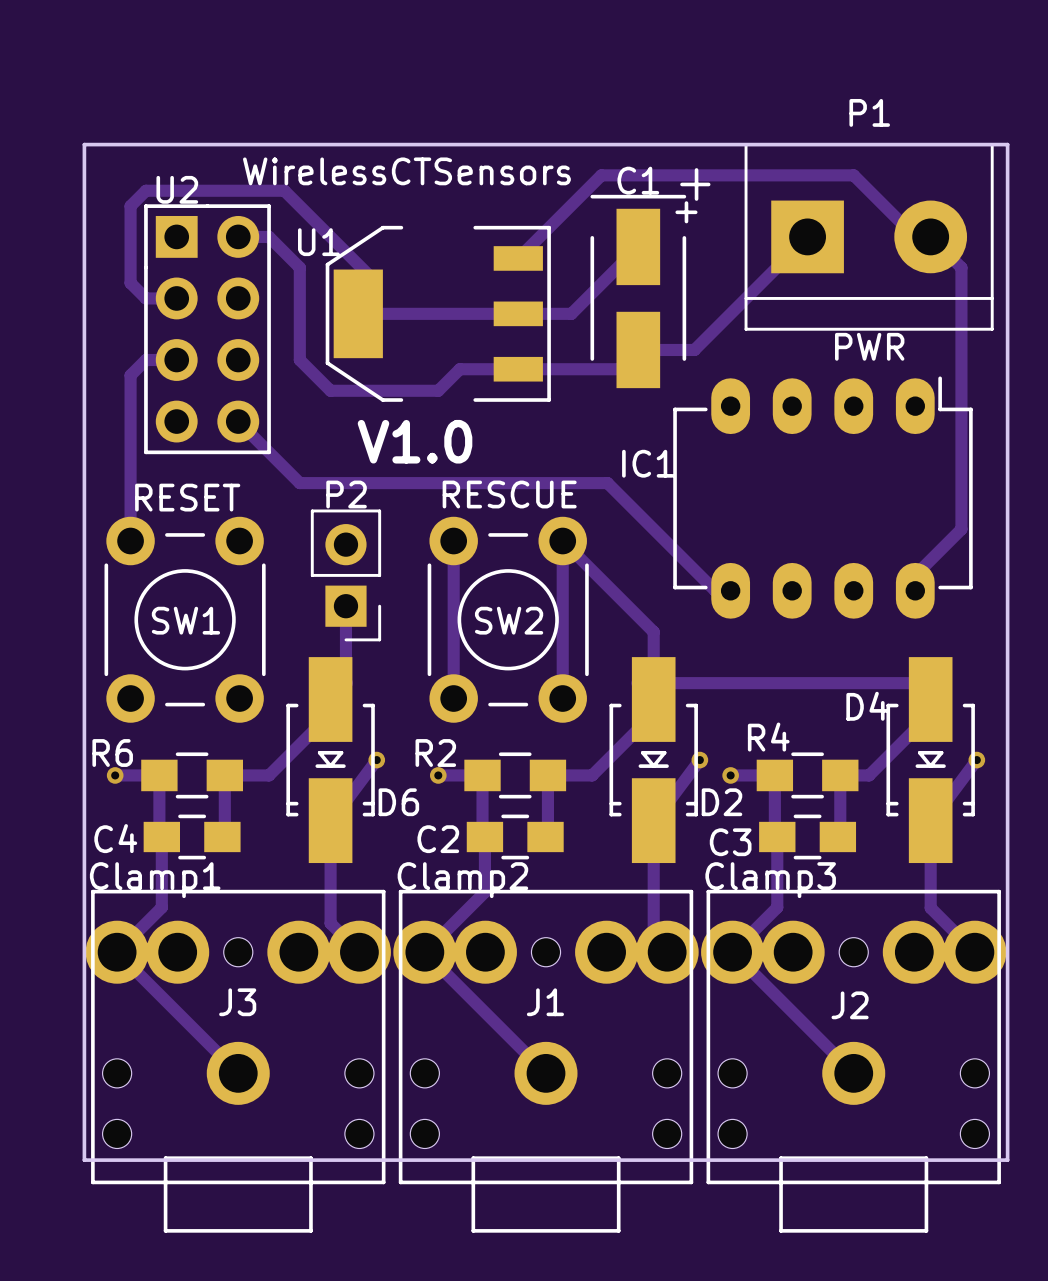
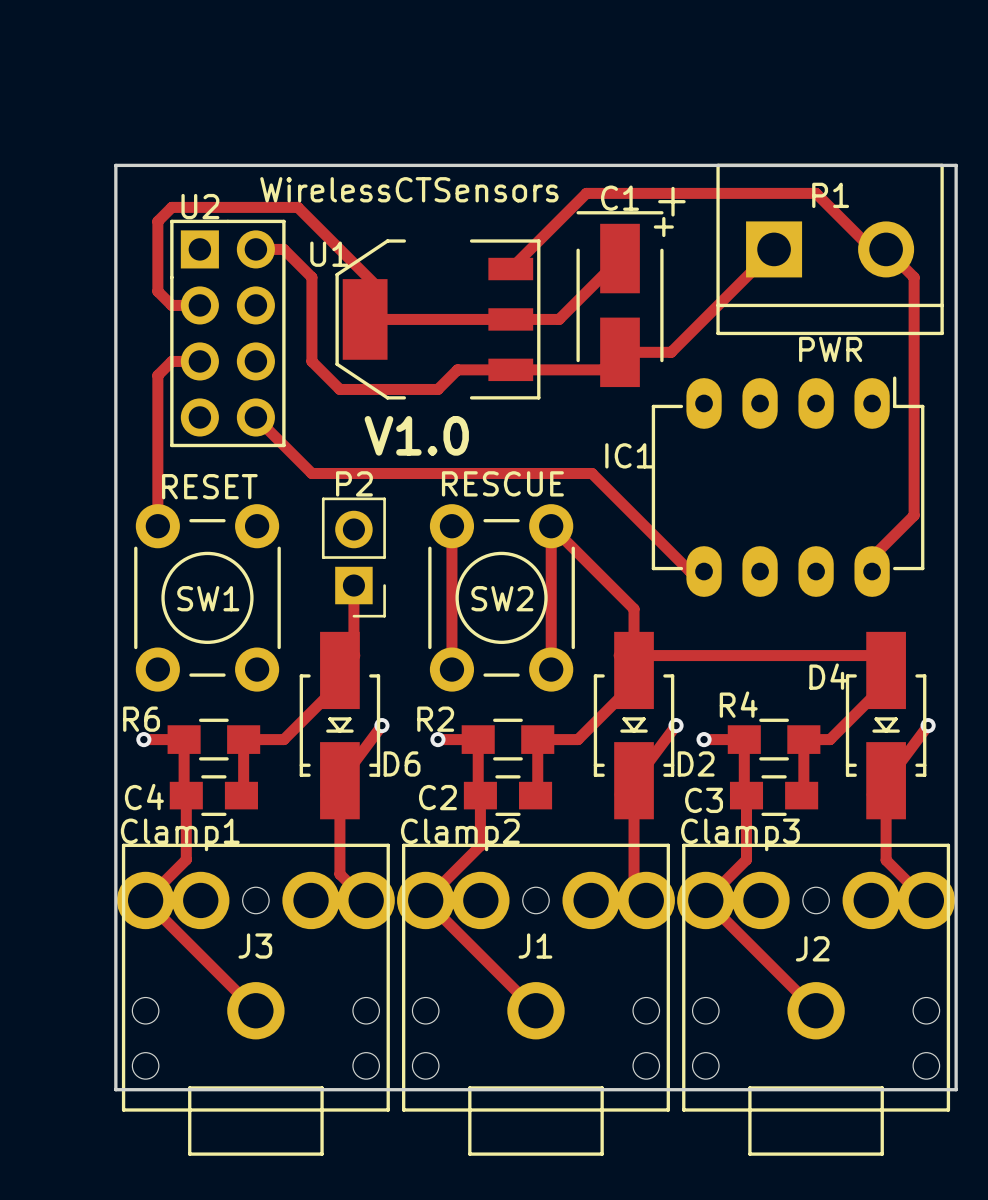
P1 name position: P1 (869, 112) -> P1 (830, 195)
P1 footprint: [744, 143, 994, 331] -> [716, 163, 944, 336]

